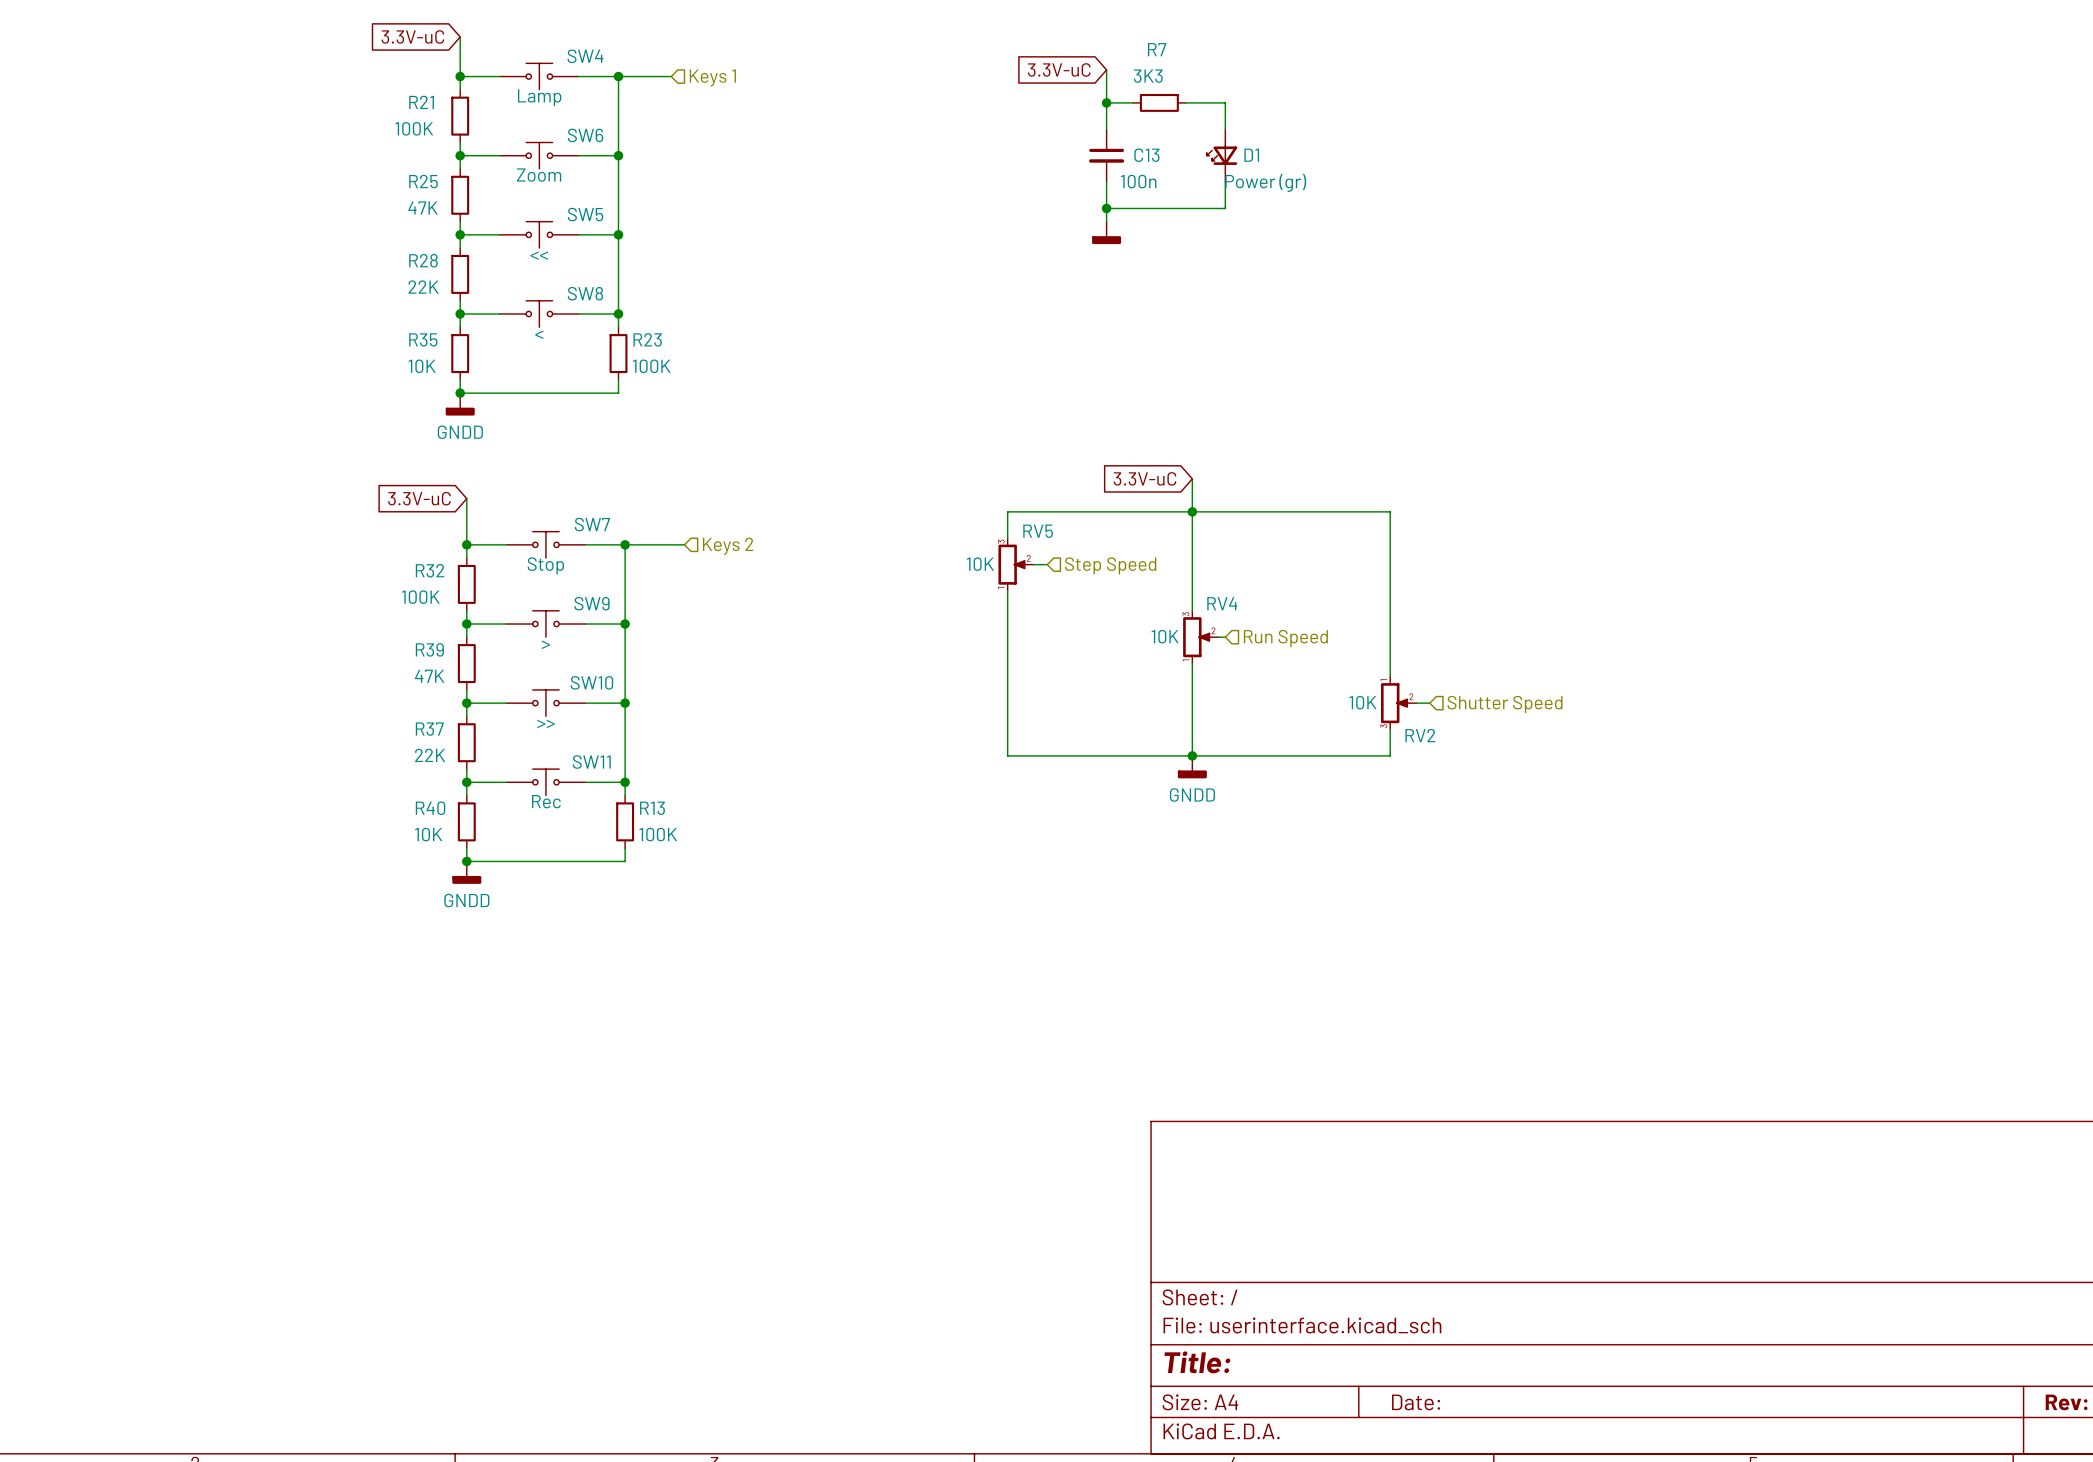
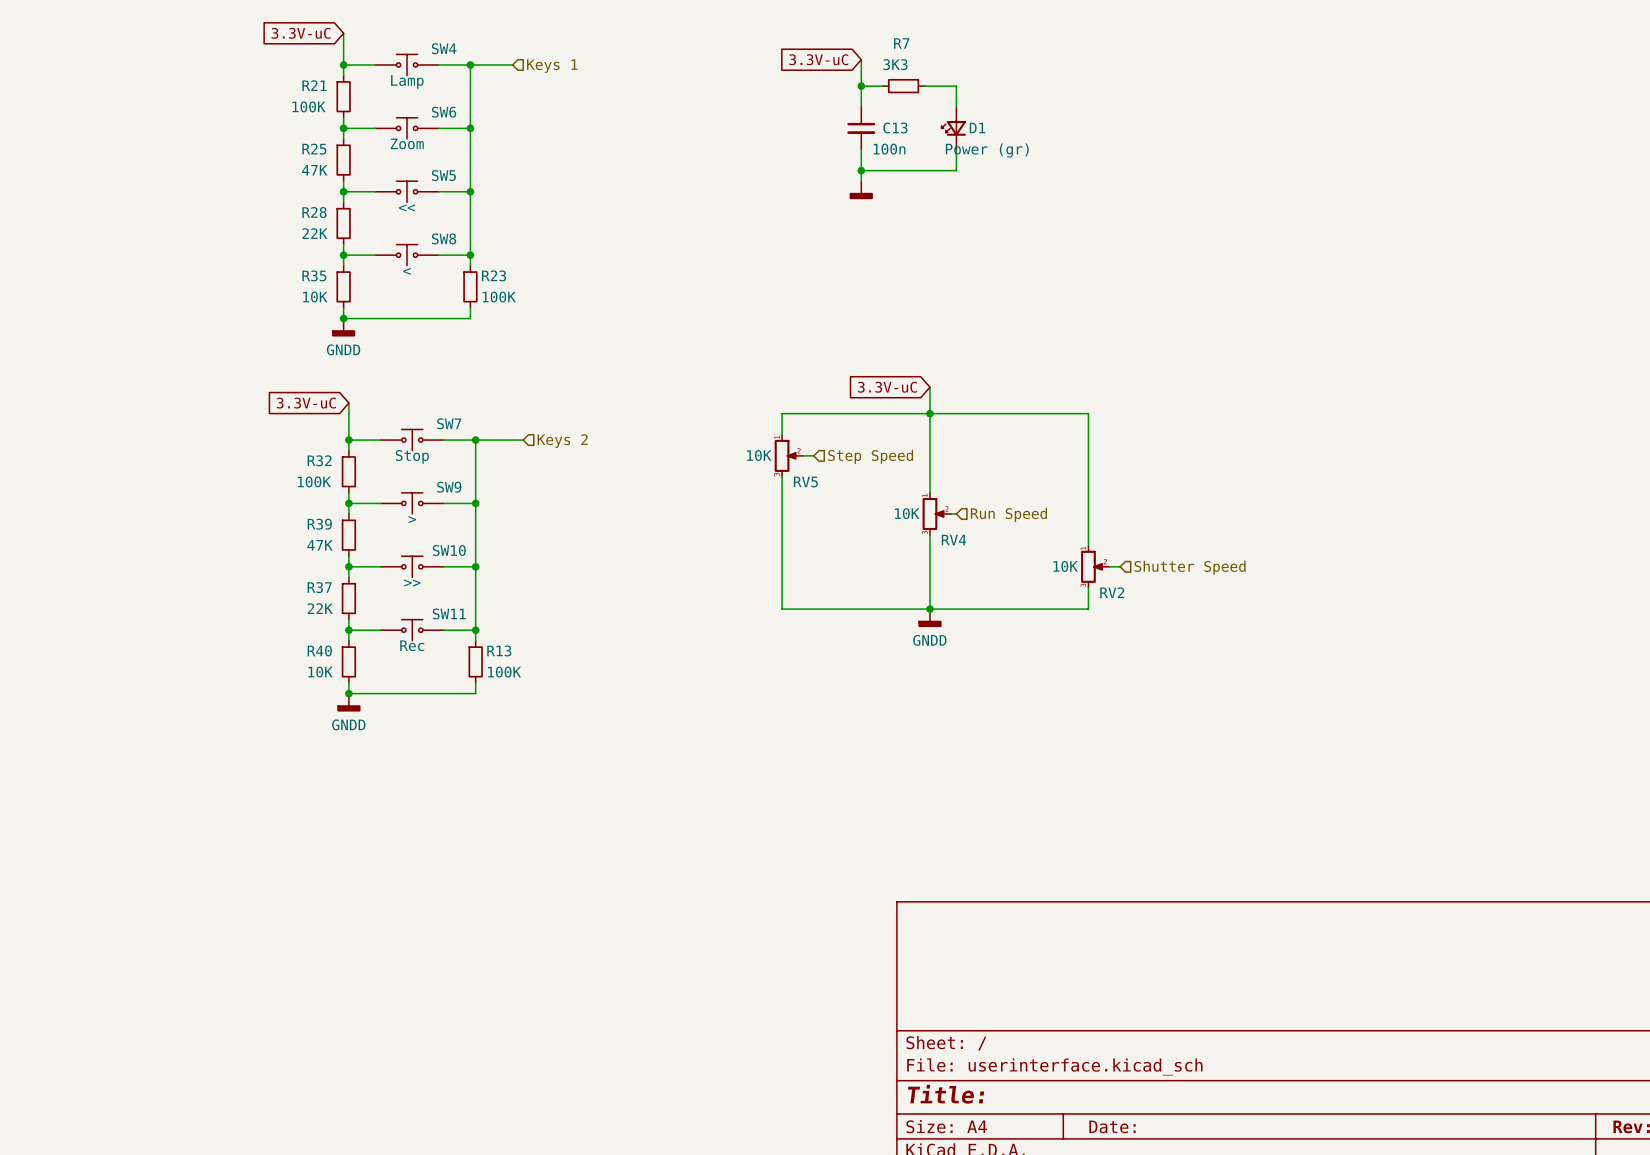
RV5 flip: as is (1011, 564) -> up-down (785, 455)
RV4 flip: as is (1196, 637) -> up-down (933, 514)

